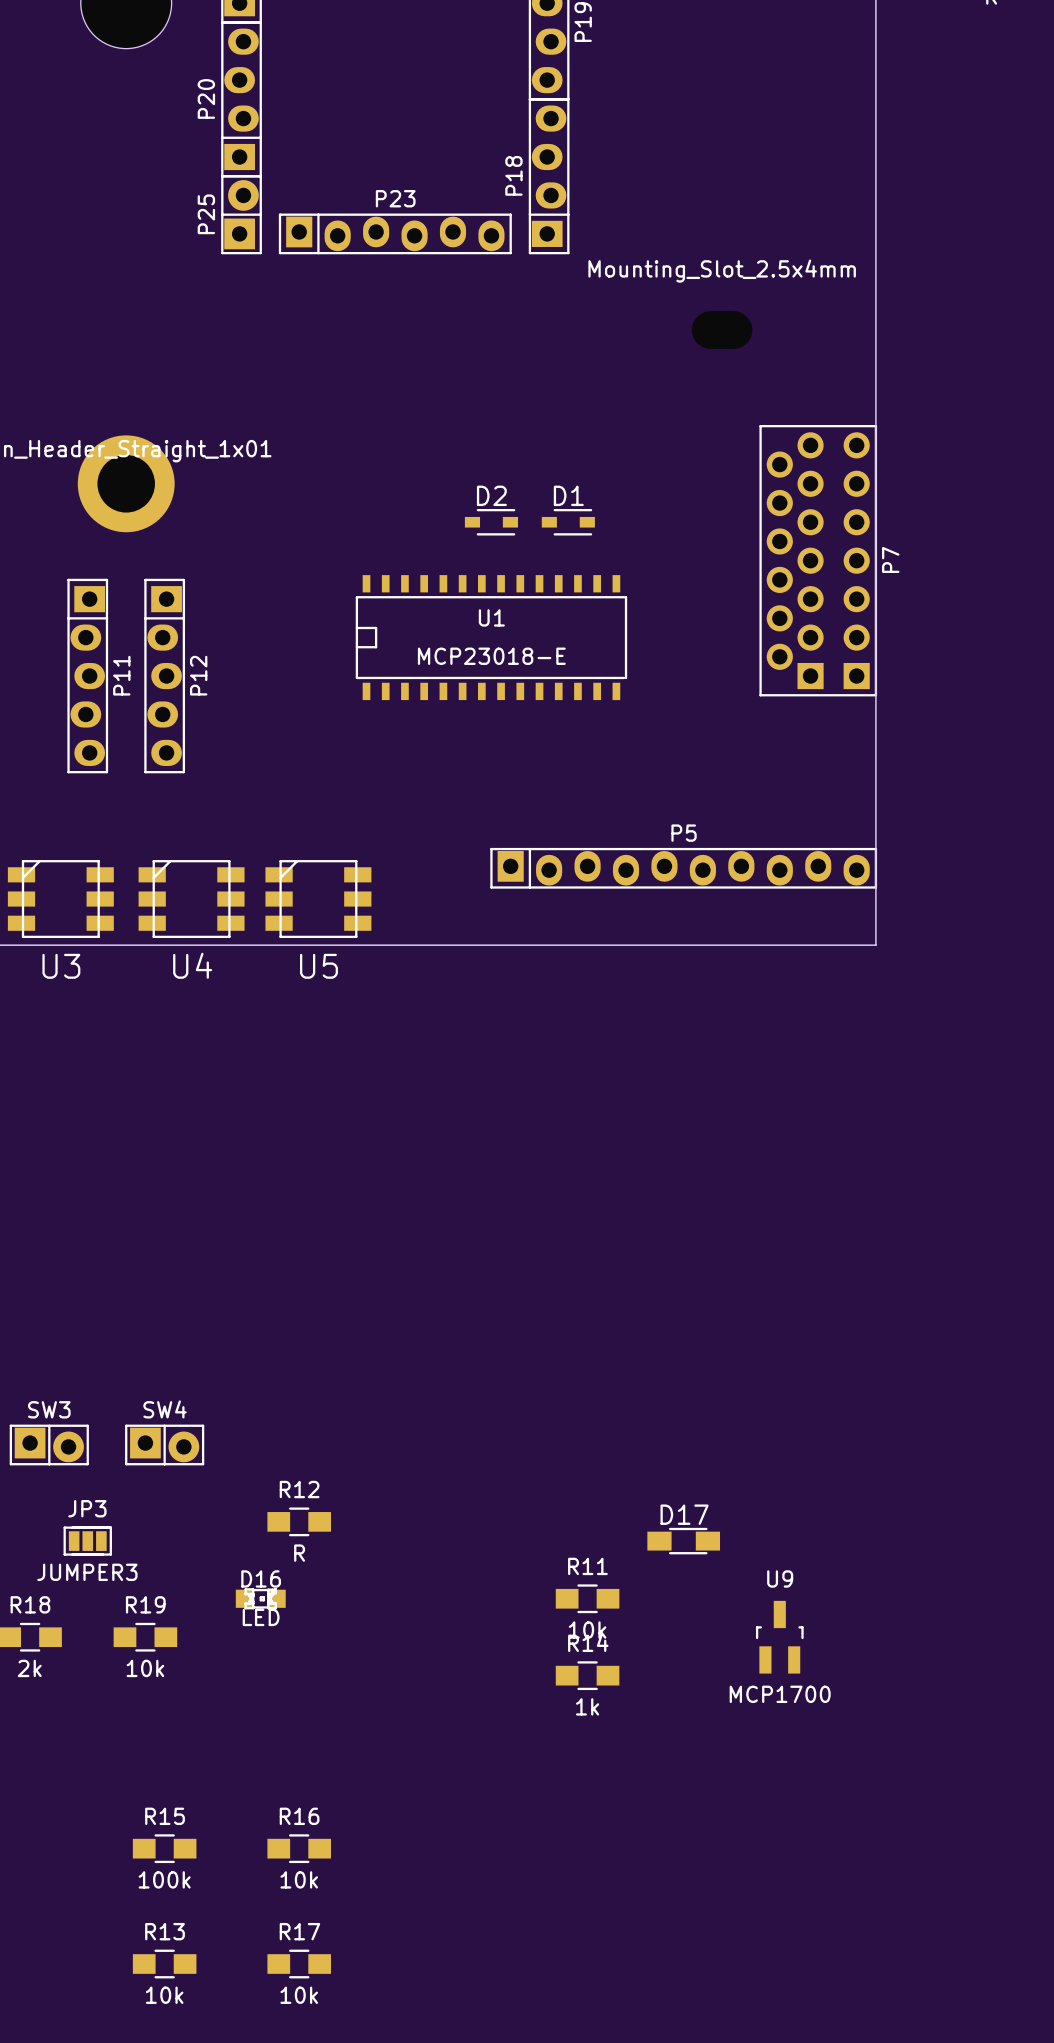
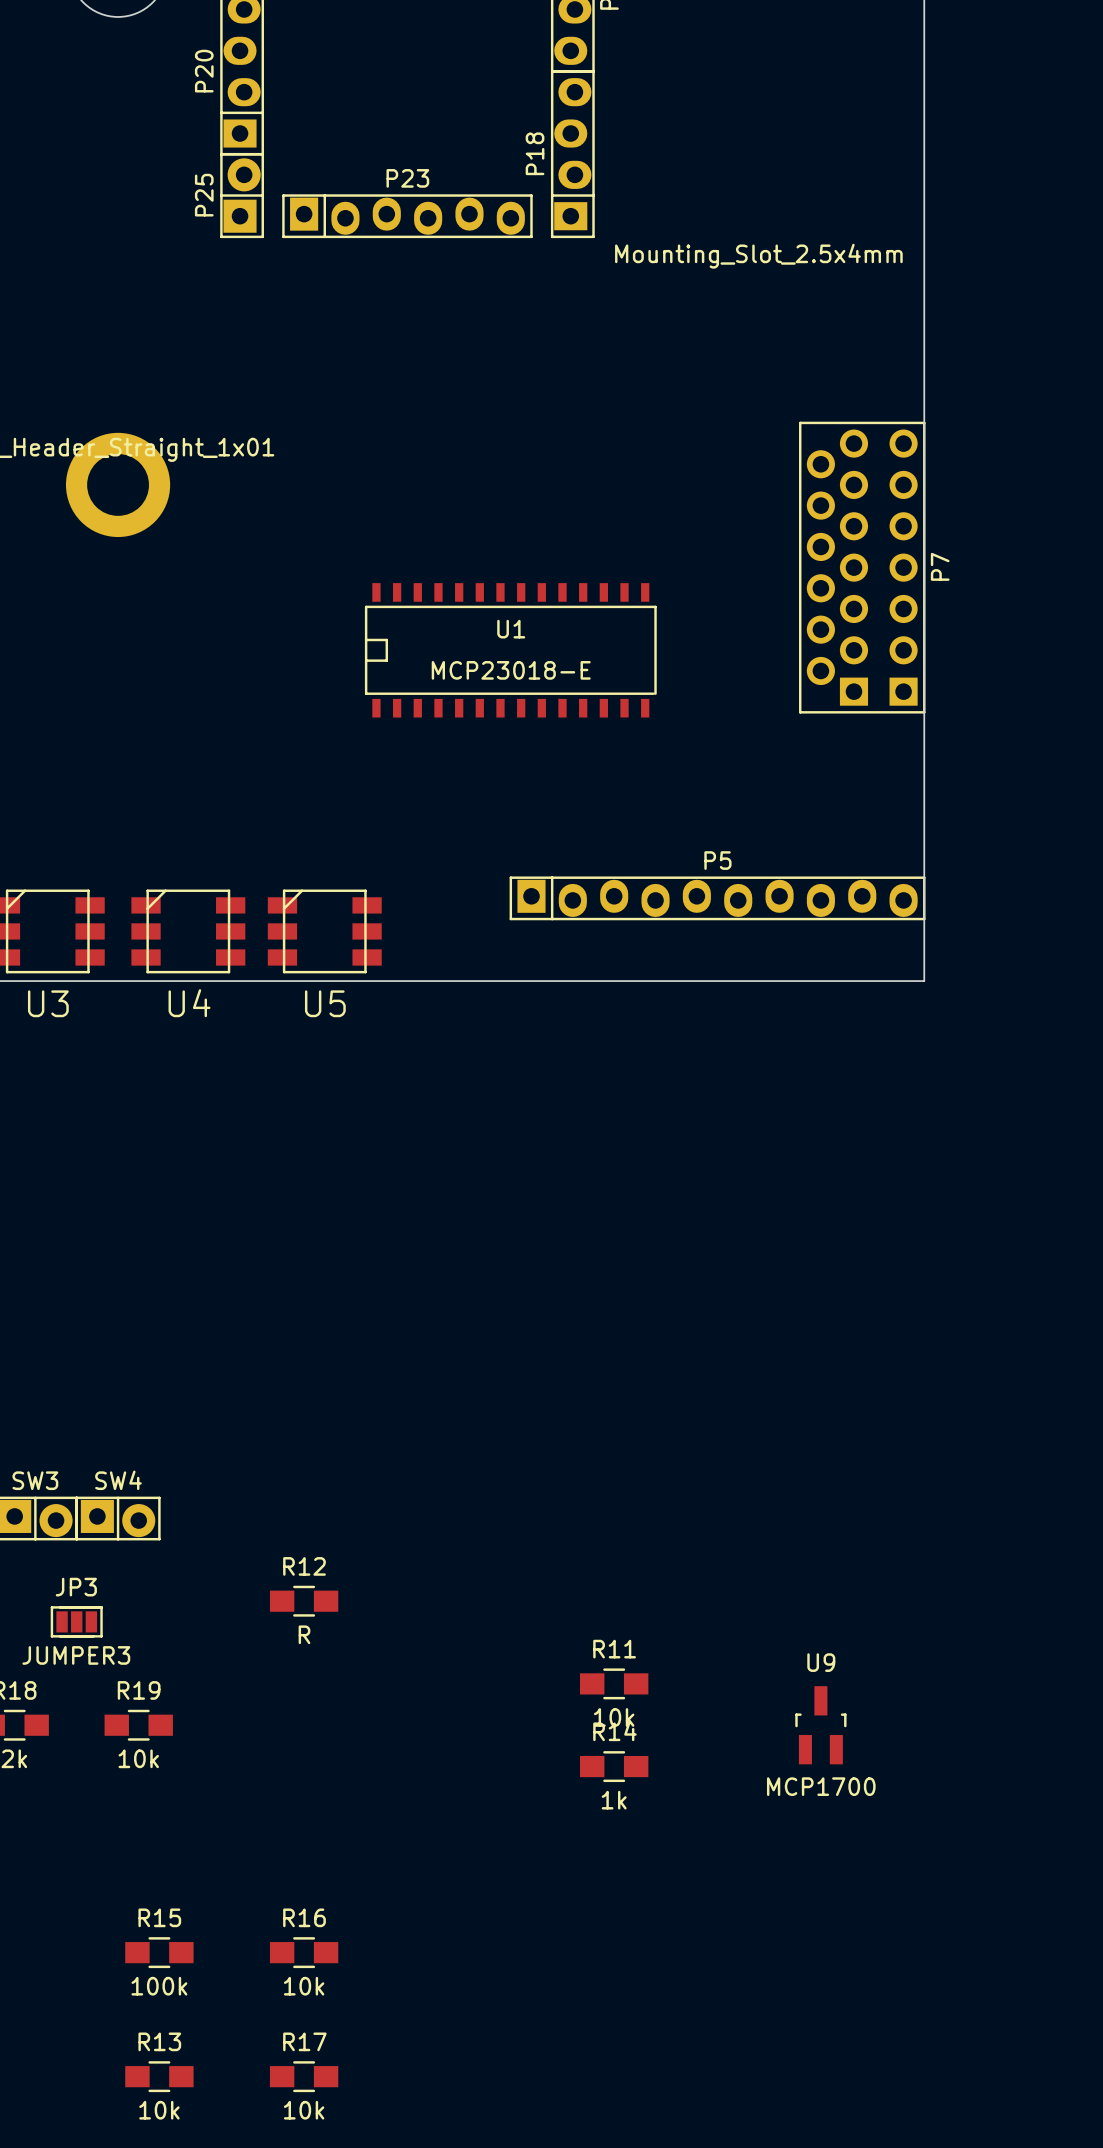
D2: (491, 522) -> none
D1: (568, 522) -> none
P11: (87, 676) -> none
P12: (164, 676) -> none
SW4 position: (164, 1444) -> (118, 1518)
D17: (683, 1541) -> none
D16: LED (260, 1598) -> none

